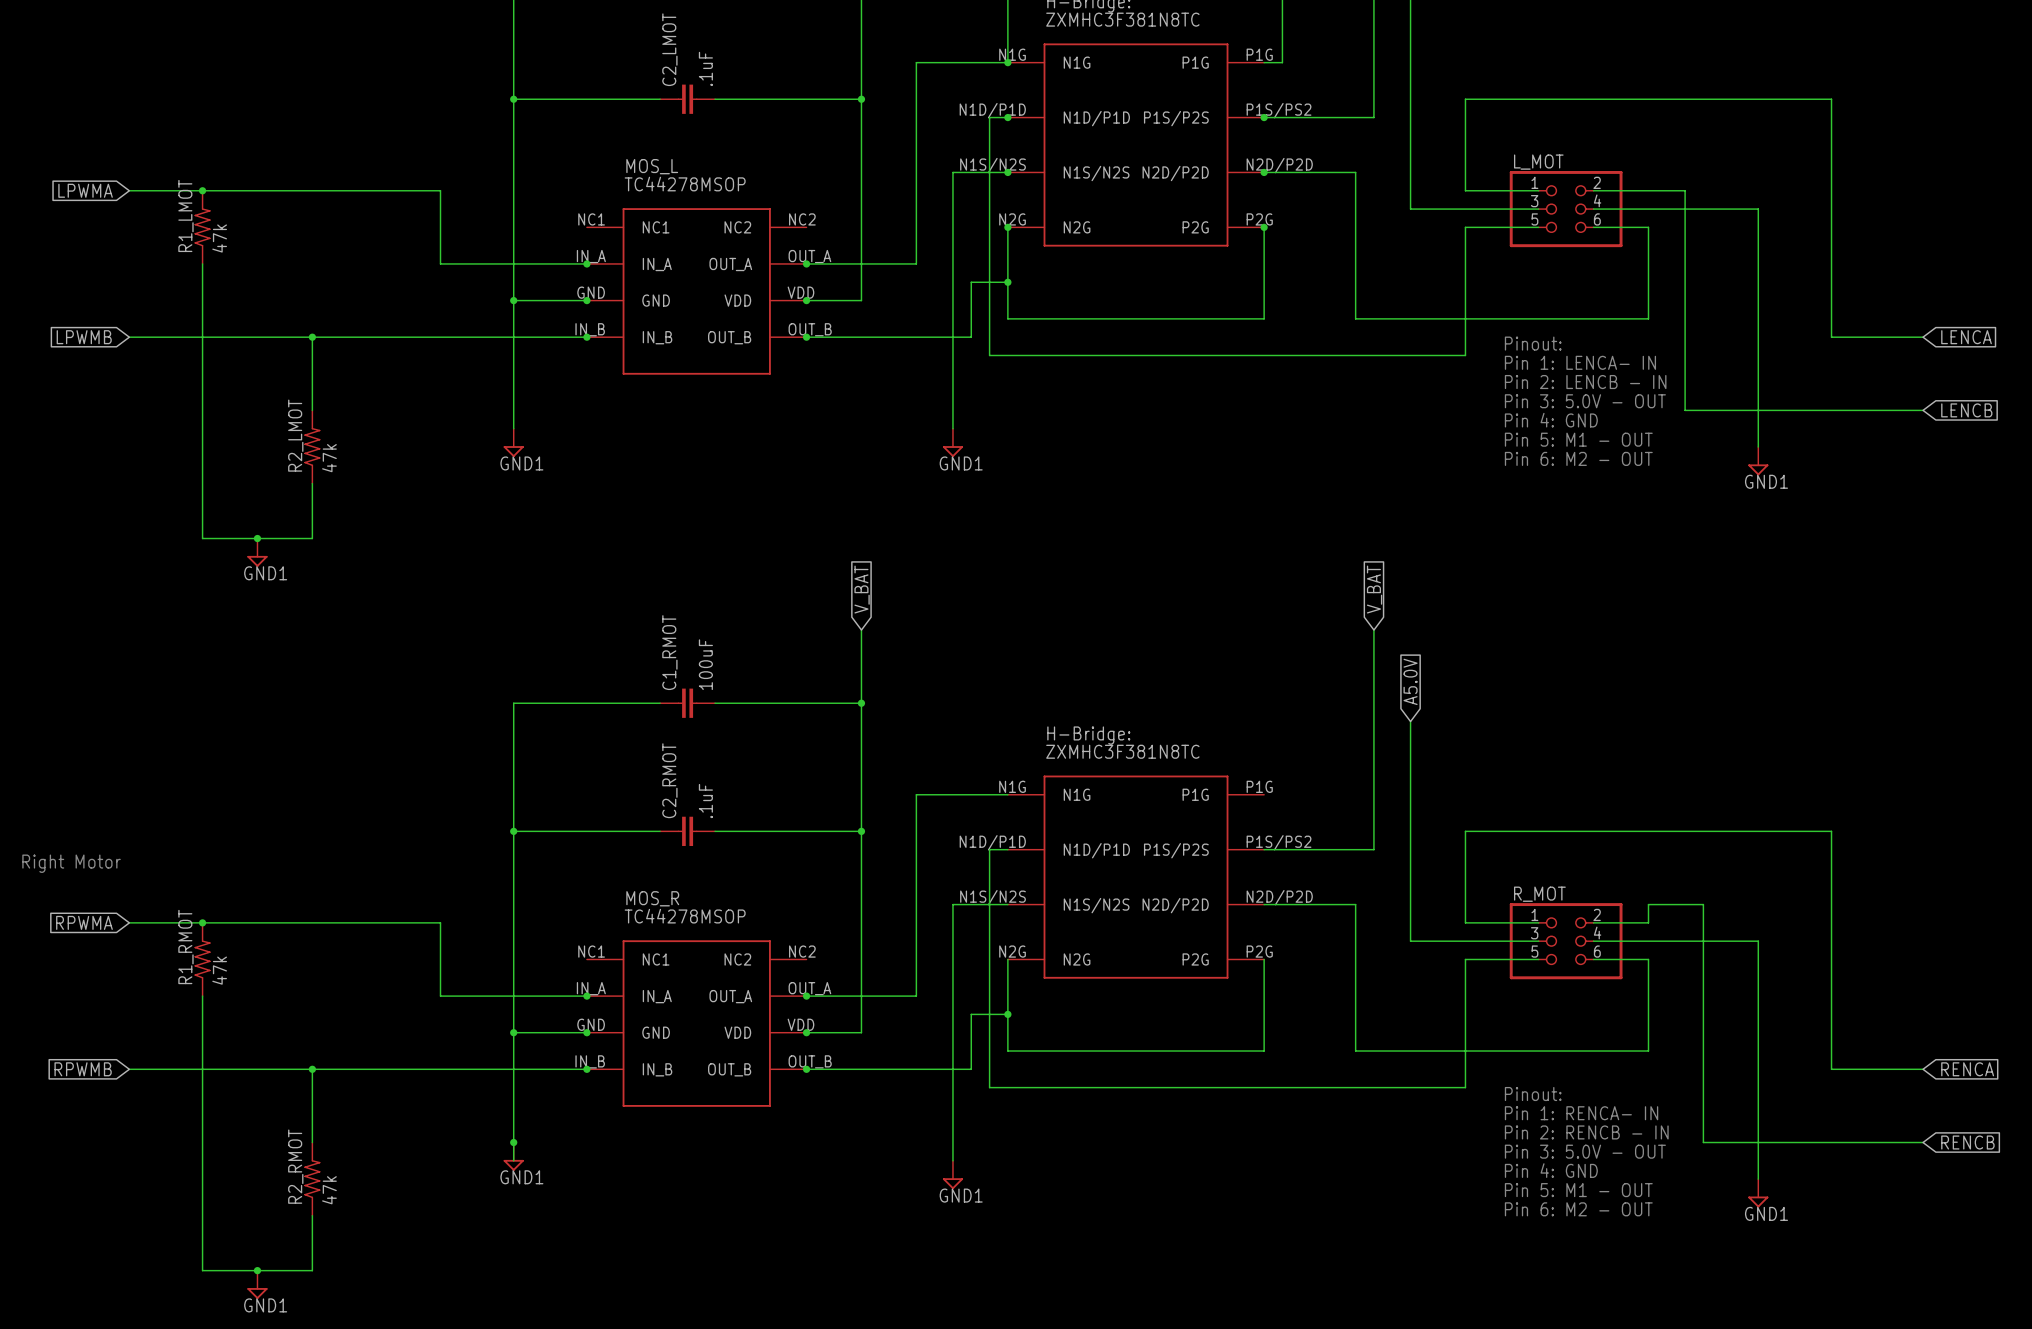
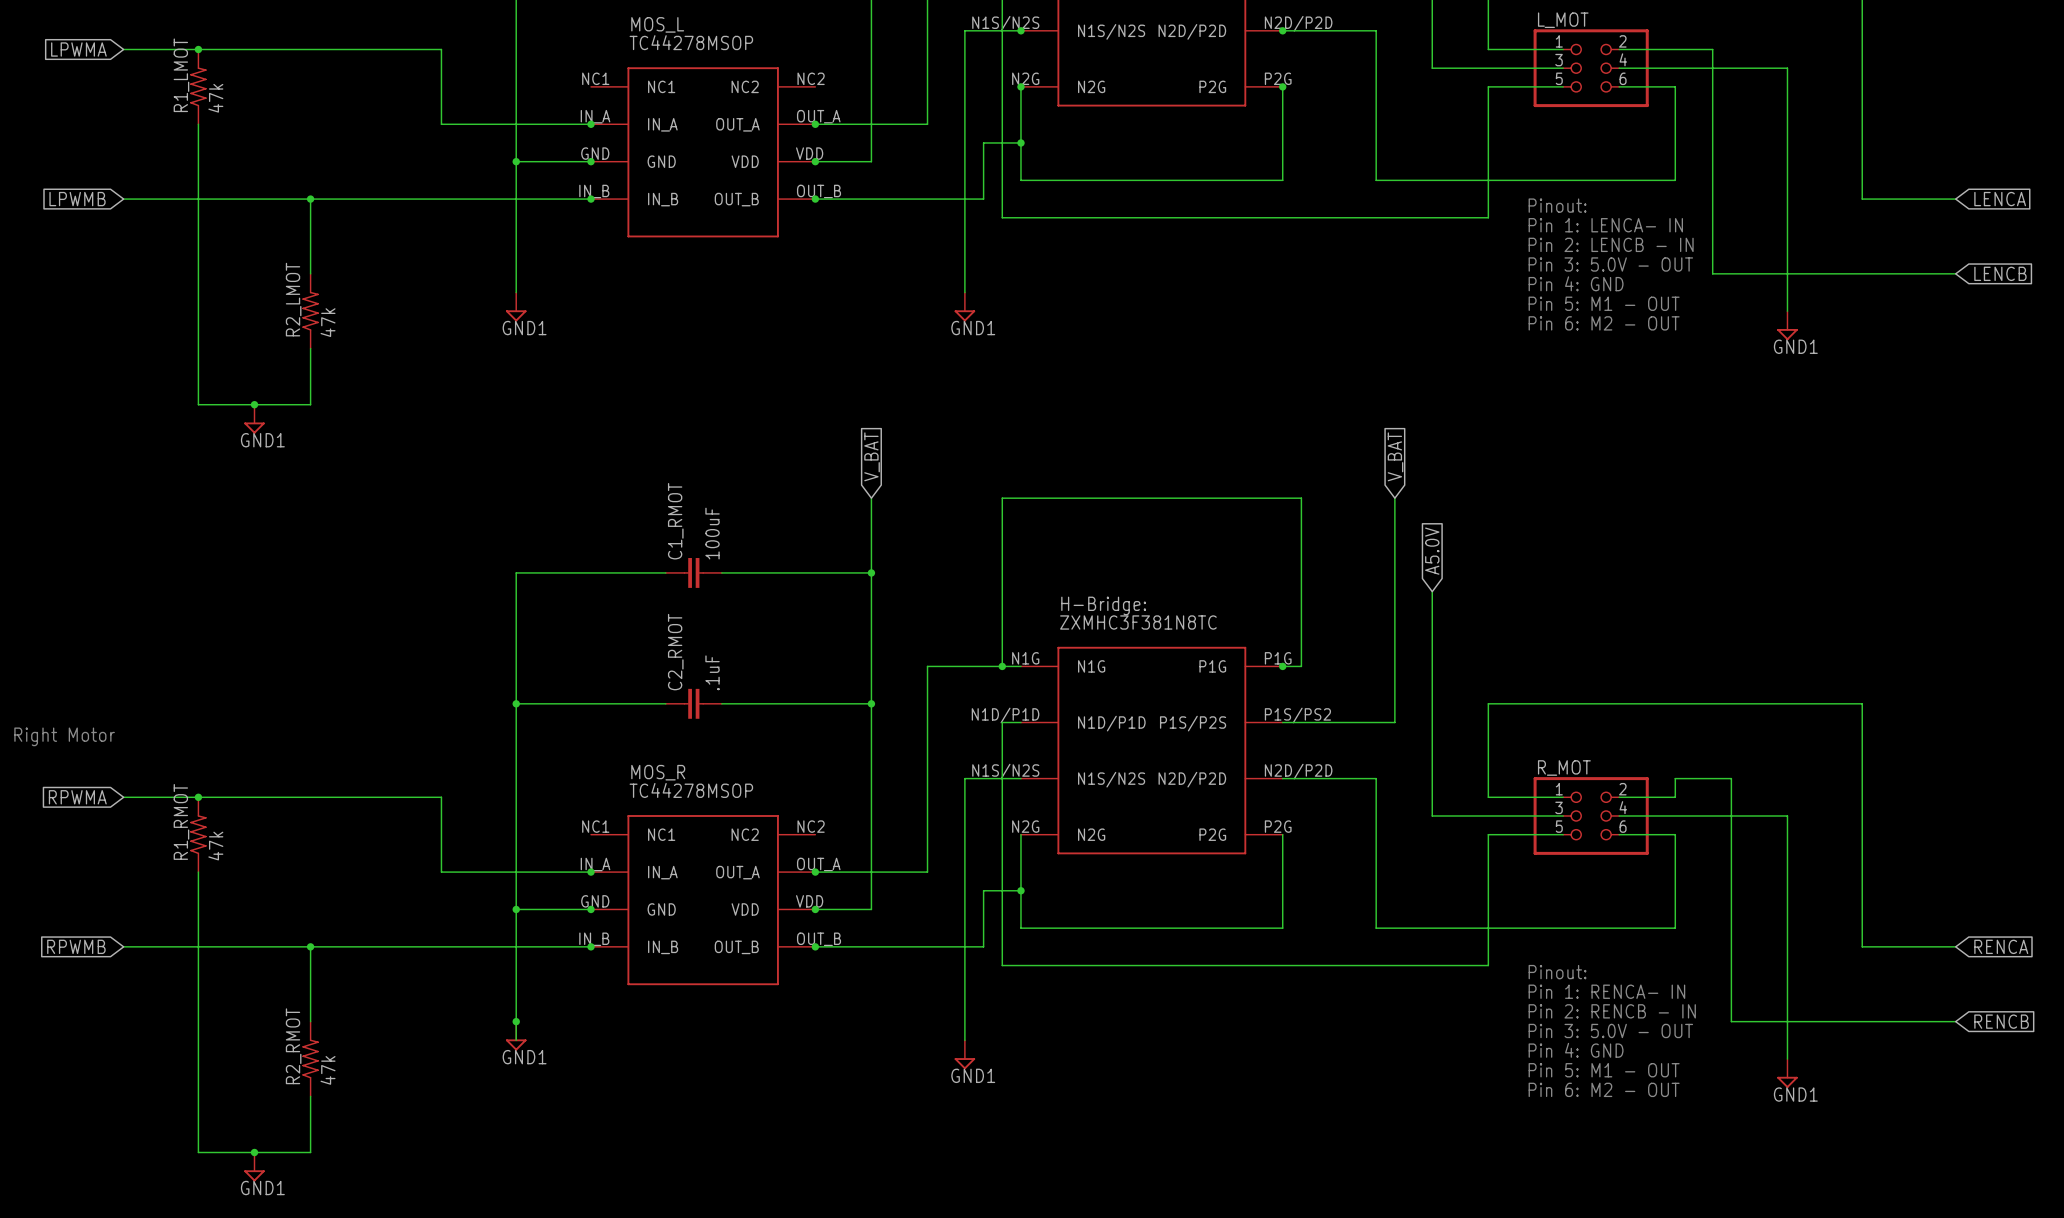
wire: none -> (1002, 666) (1002, 498) (1301, 498) (1301, 666) (1282, 666)
junction: none -> (1002, 666)
junction: none -> (1282, 666)

